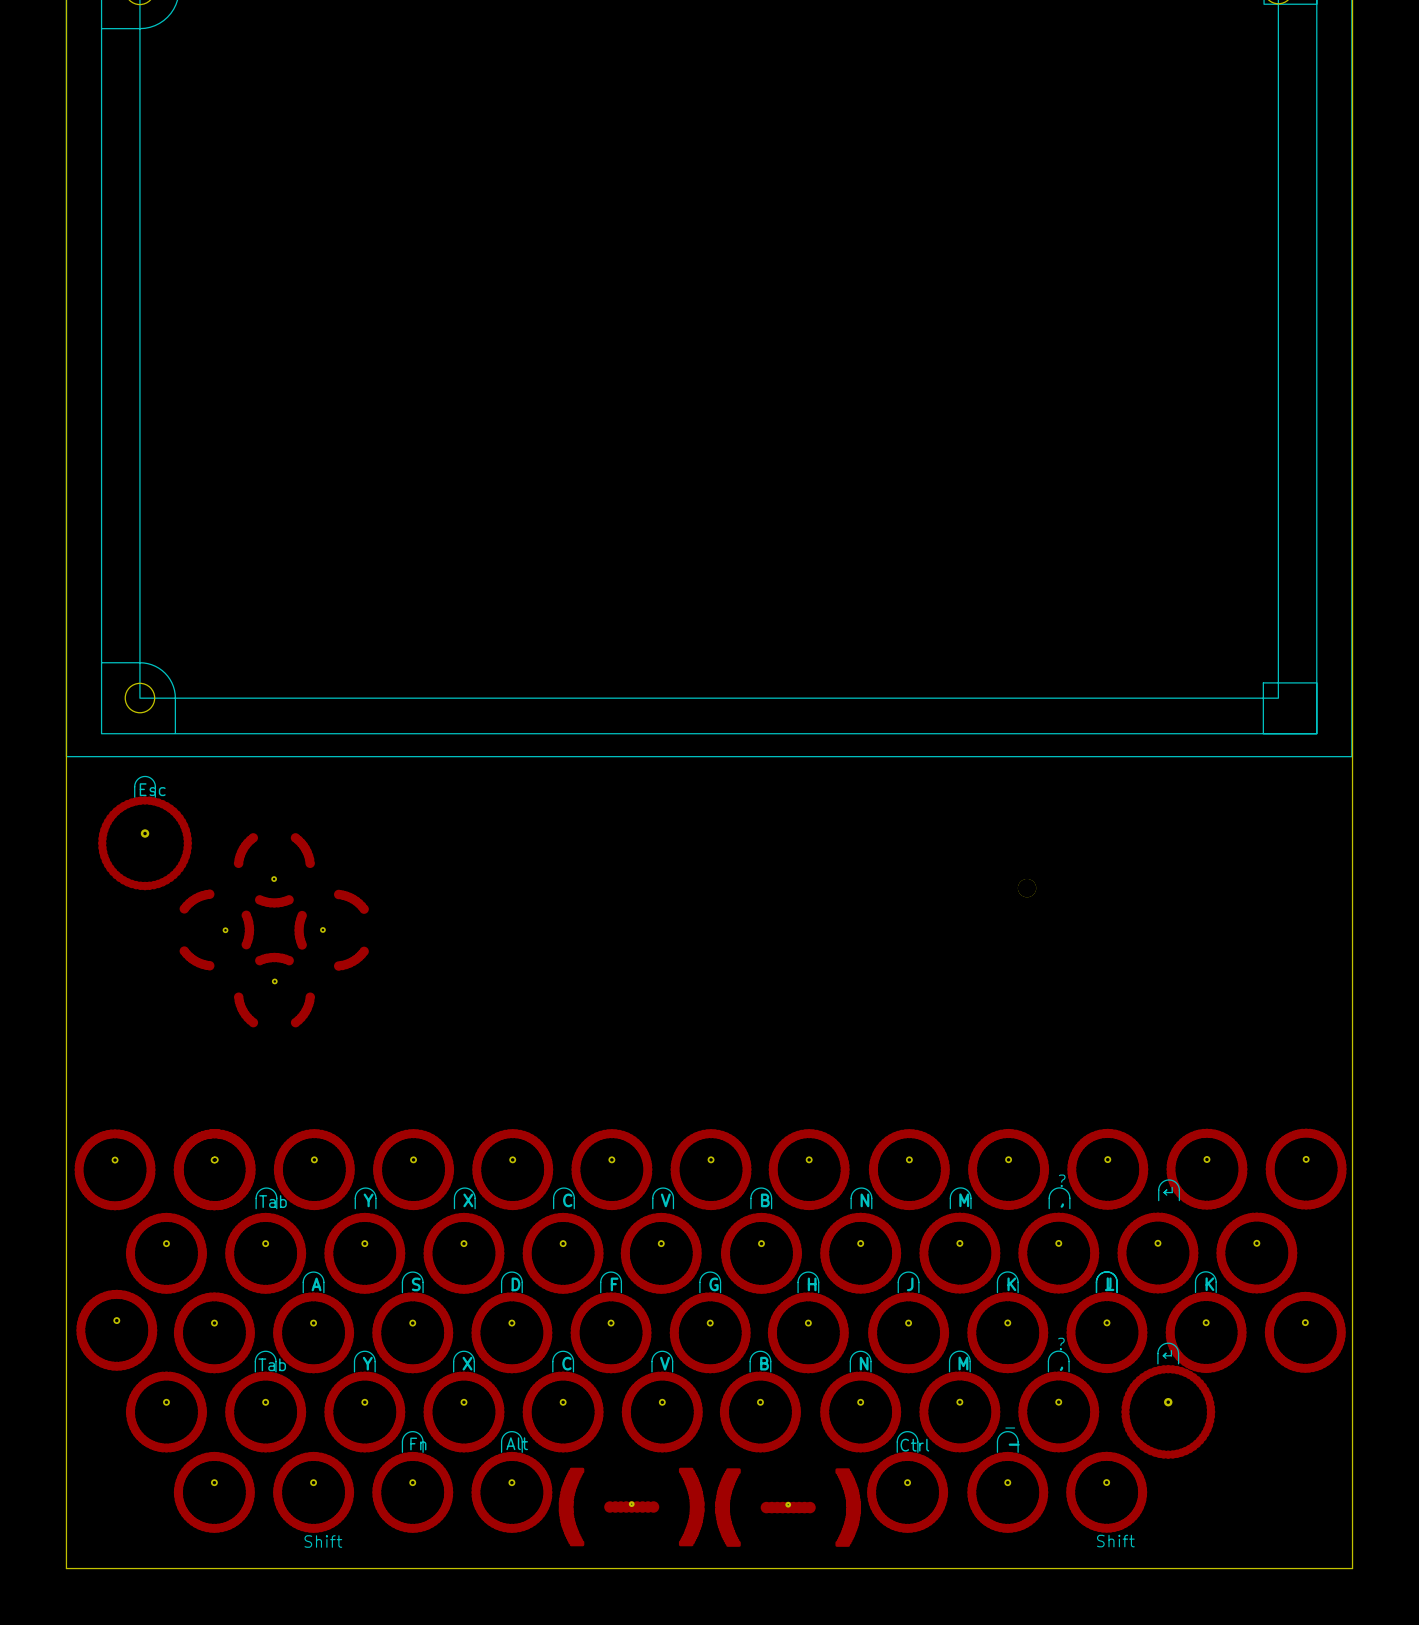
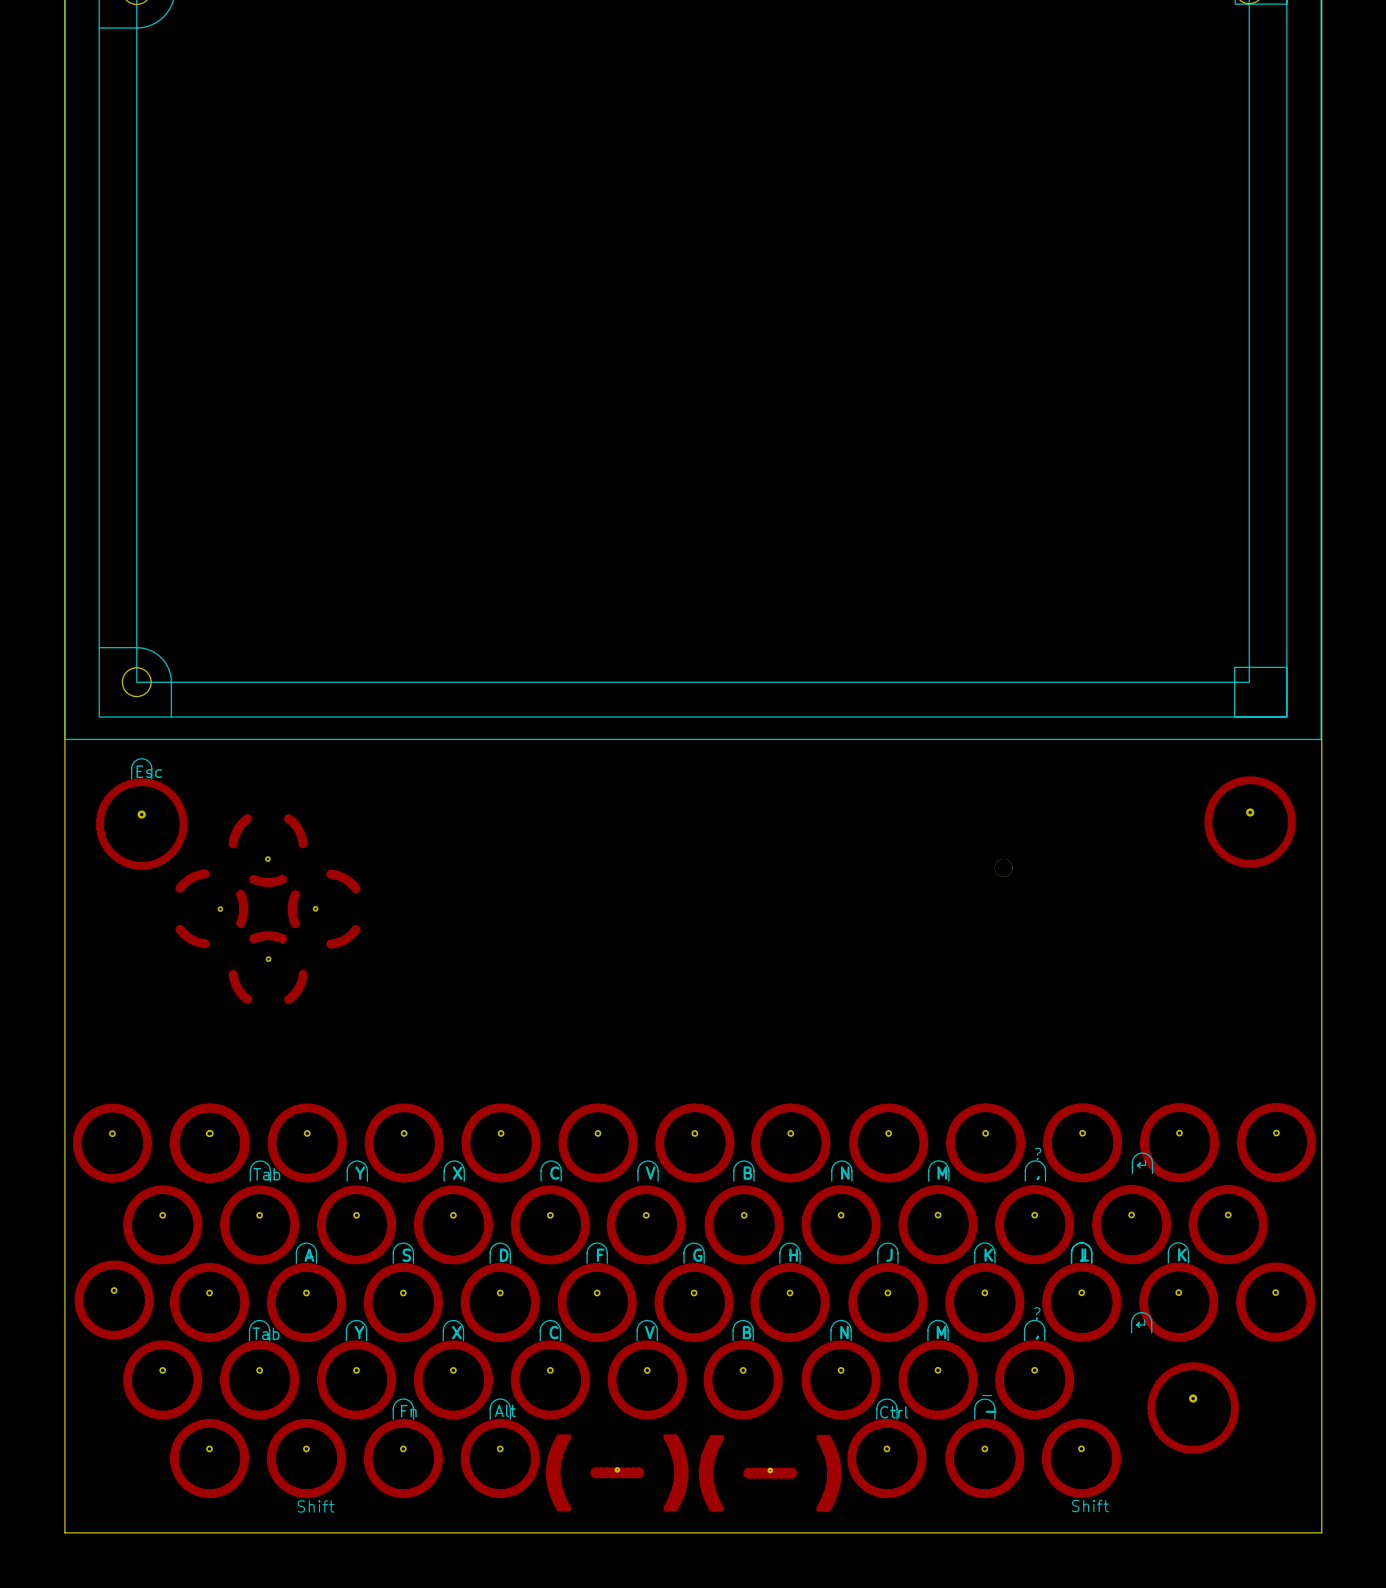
part: none -> (1250, 821)
part position: (1168, 1411) -> (1193, 1408)

